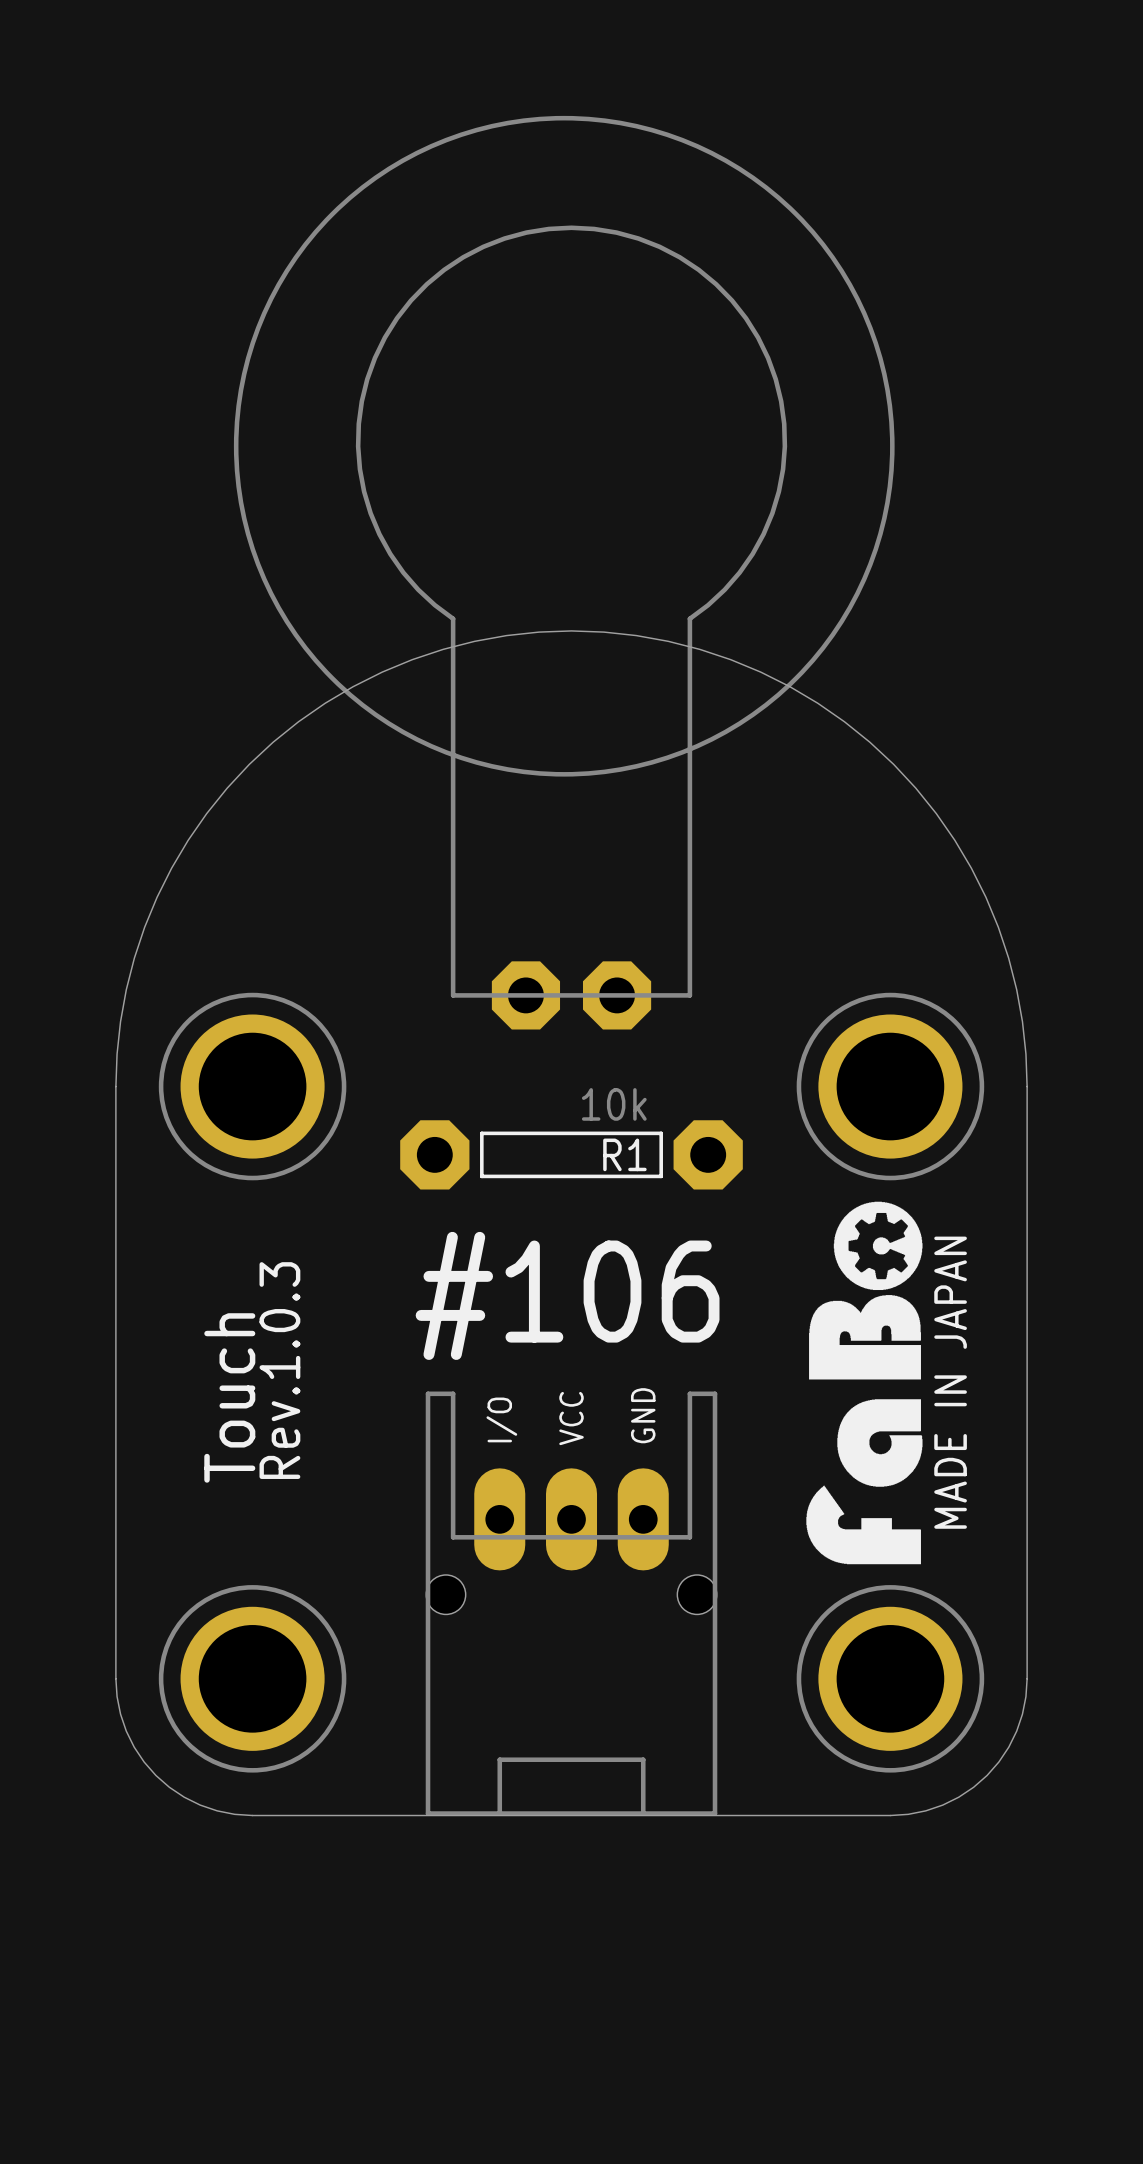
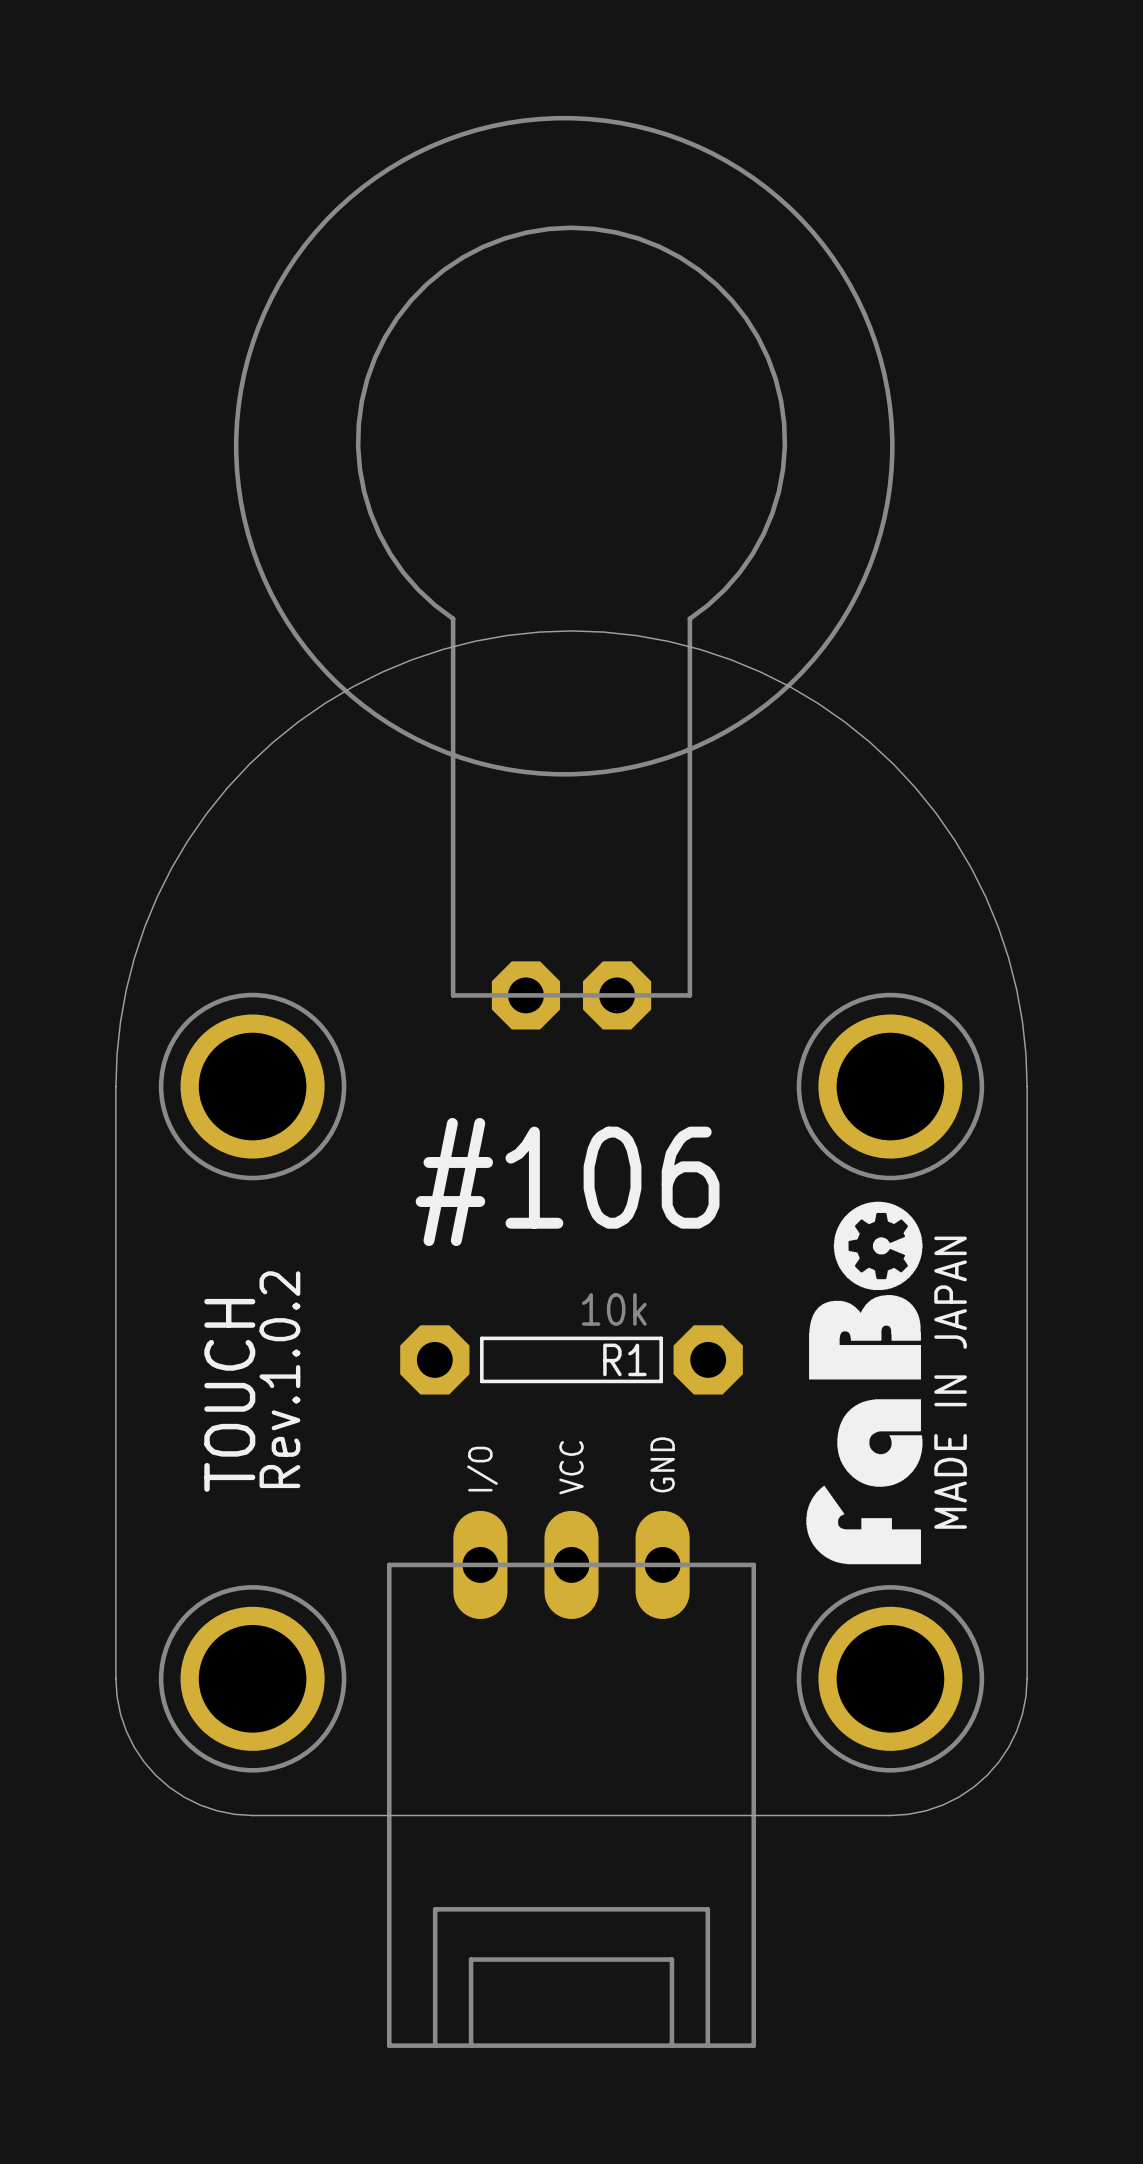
R1 position: (571, 1154) -> (571, 1359)
part: (571, 1223) -> none
text position: #106 (567, 1295) -> #106 (567, 1182)
part: none -> (571, 1339)
text: Rev.1.0.3 (279, 1370) -> Rev.1.0.2 (279, 1379)
text: Touch (229, 1397) -> TOUCH (229, 1395)

